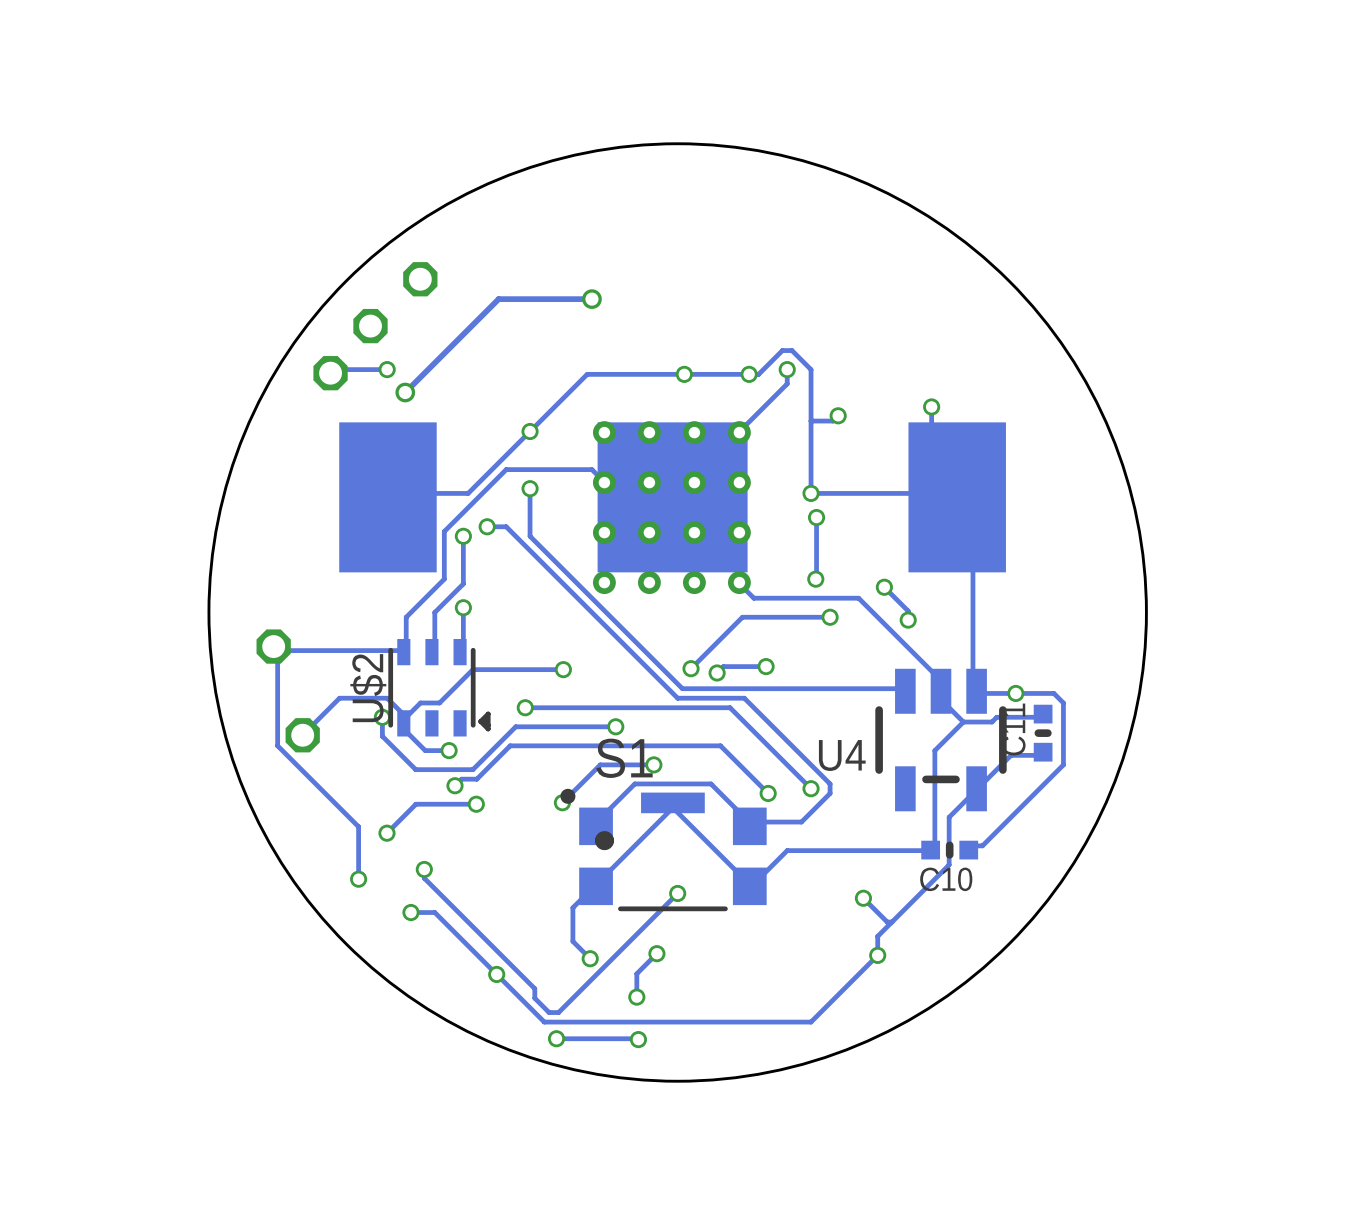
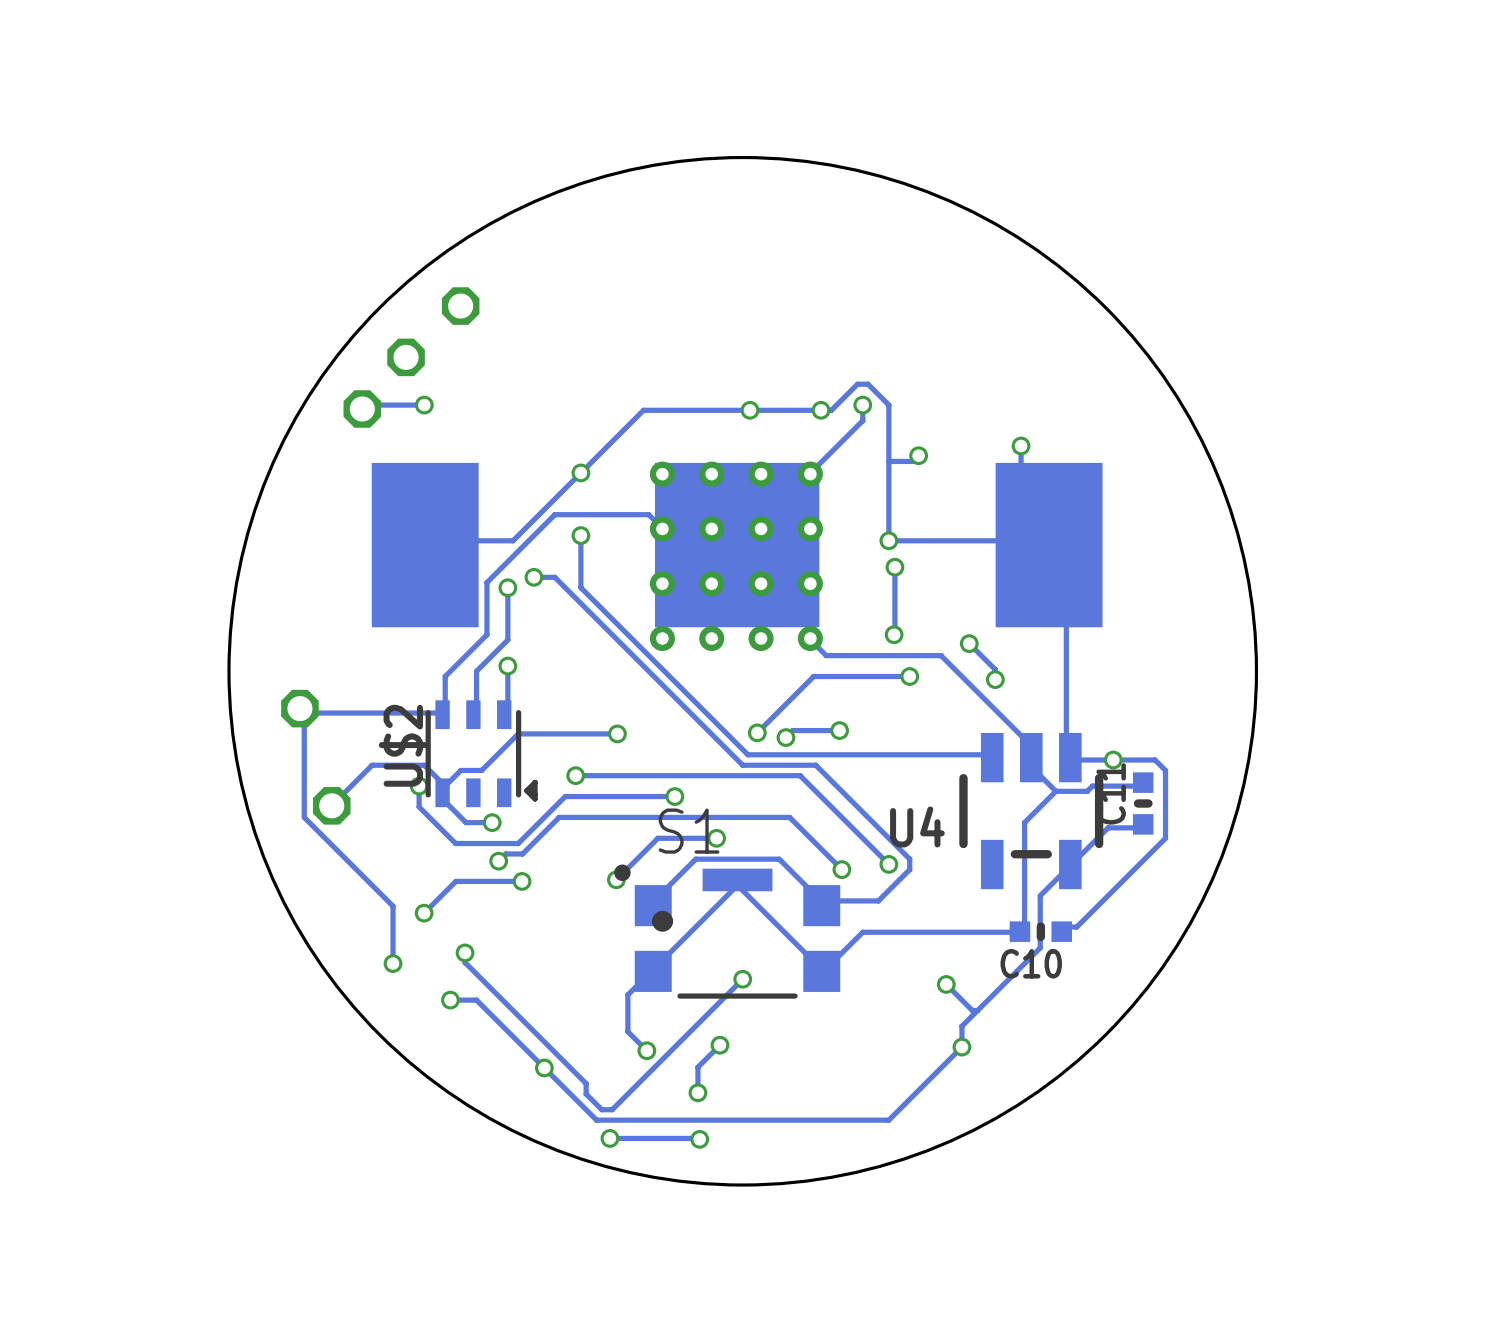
track: (591, 299) (498, 299) (405, 392) -> none
via: (591, 299) -> none
via: (405, 392) -> none

